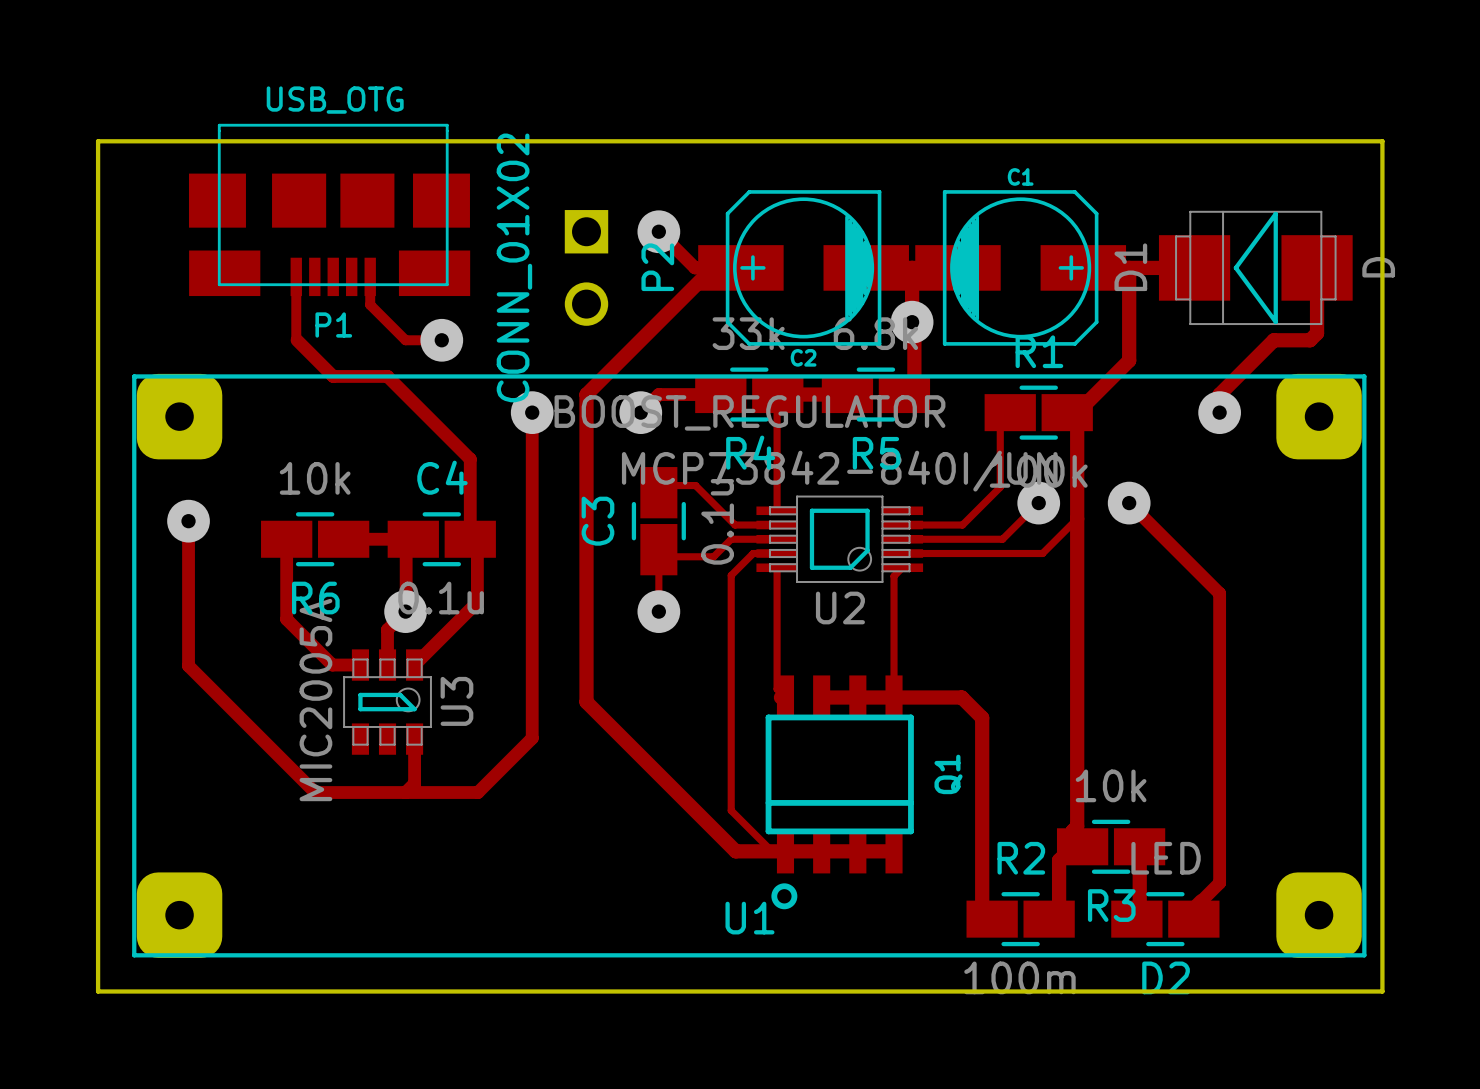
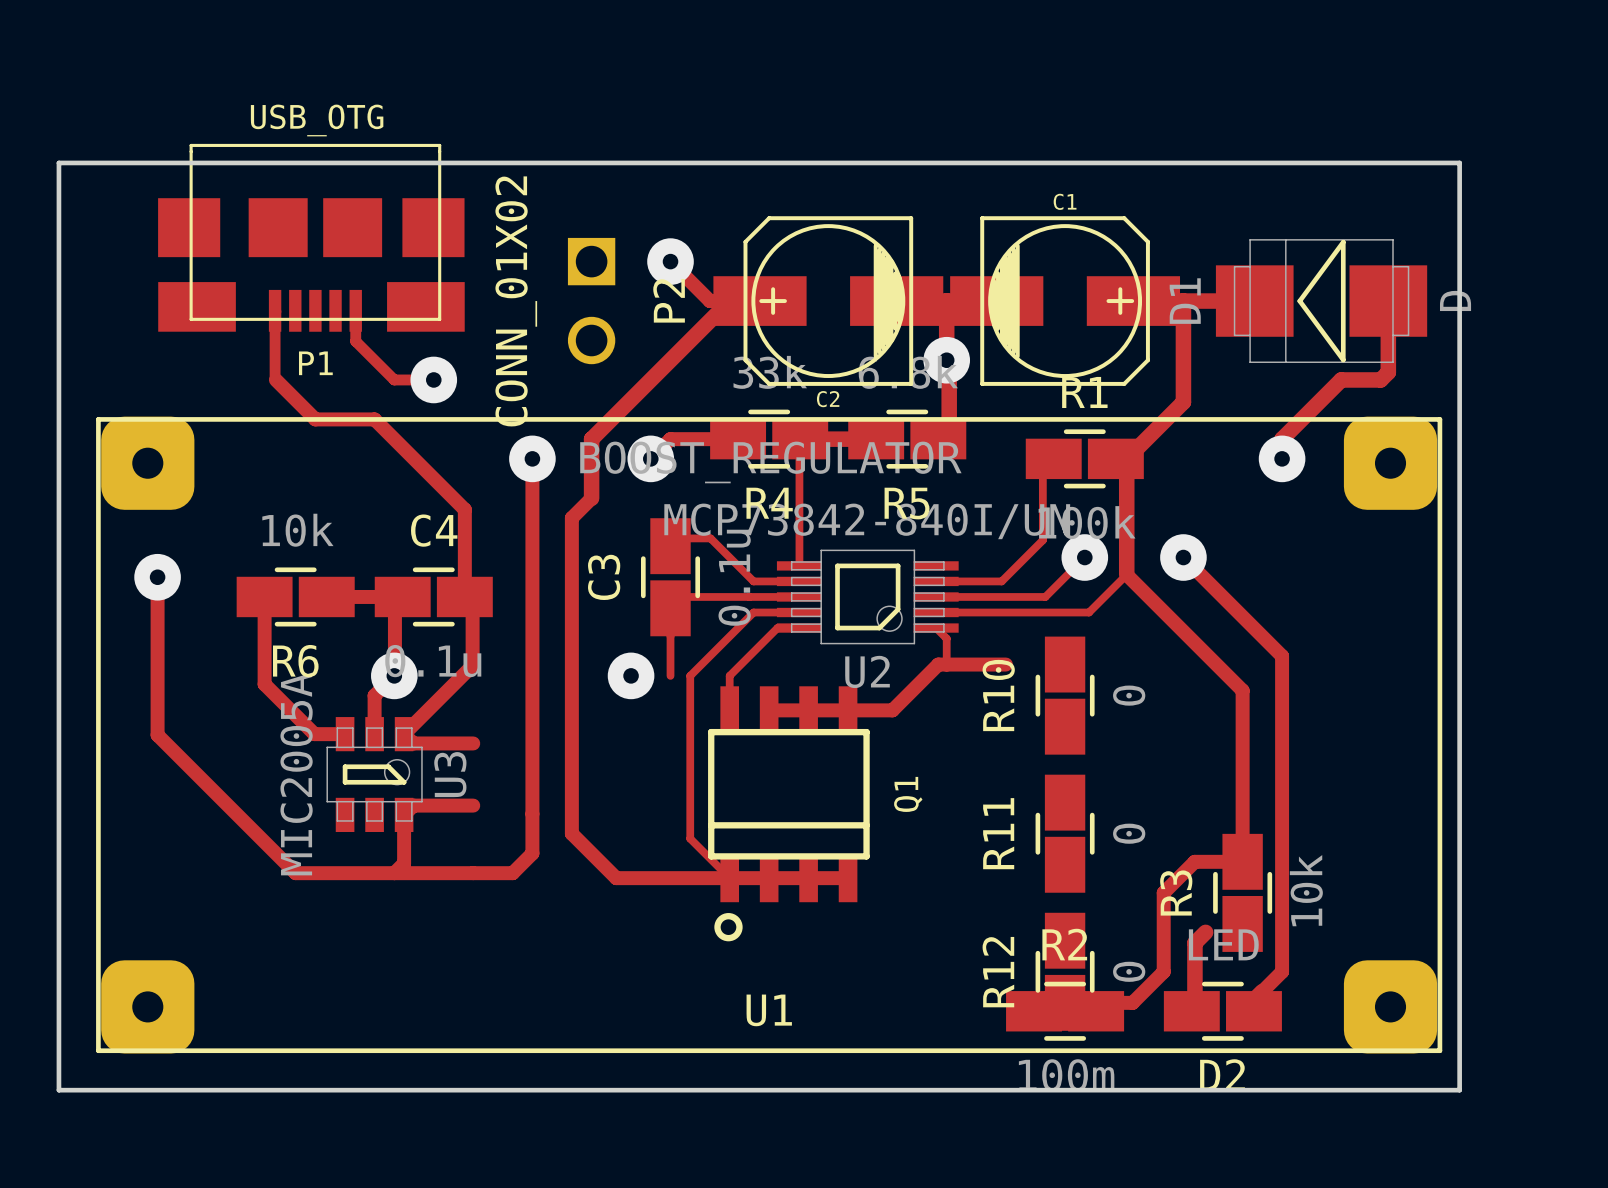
track: (586, 448) (586, 702) (735, 851) (894, 851) -> (591, 498) (571, 518) (571, 833) (616, 878) (848, 878)
track: (1077, 518) (1077, 826) (1072, 830) (1072, 846) -> (1126, 574) (1242, 690) (1242, 861) (1194, 861) (1163, 892) (1163, 971) (1132, 1002) (1124, 1002)
track: (731, 539) (713, 556) (658, 556) -> (749, 596) (681, 596) (670, 608) (670, 616)
track: (753, 553) (731, 575) (731, 810) (771, 851) (785, 851) -> (773, 612) (753, 612) (690, 675) (690, 838) (729, 878)
track: (777, 567) (777, 689) (785, 697) (780, 697) -> (799, 628) (777, 628) (729, 675) (729, 710)
track: (902, 567) (894, 576) (894, 697) -> (936, 628) (946, 638) (946, 664)
track: none -> (1005, 664) (938, 664) (892, 710) (769, 710)
via position: (658, 611) -> (631, 675)
R10: none -> 0 (1065, 695)
track: none -> (404, 734) (413, 743) (473, 743)
track: (821, 697) (961, 697) (982, 717) (982, 919) -> none
track: none -> (473, 805) (413, 805) (404, 814)
track: (532, 738) (477, 792) -> (532, 813) (532, 853) (512, 873) (473, 873)
R11: none -> 0 (1065, 833)
Q1 position: (839, 792) -> (788, 813)
R3 rotation: 0° (1111, 846) -> 90° clockwise (1242, 892)
R3 position: (1111, 846) -> (1242, 892)
track: (1059, 860) (1059, 919) -> none
R12: none -> 0 (1065, 971)

